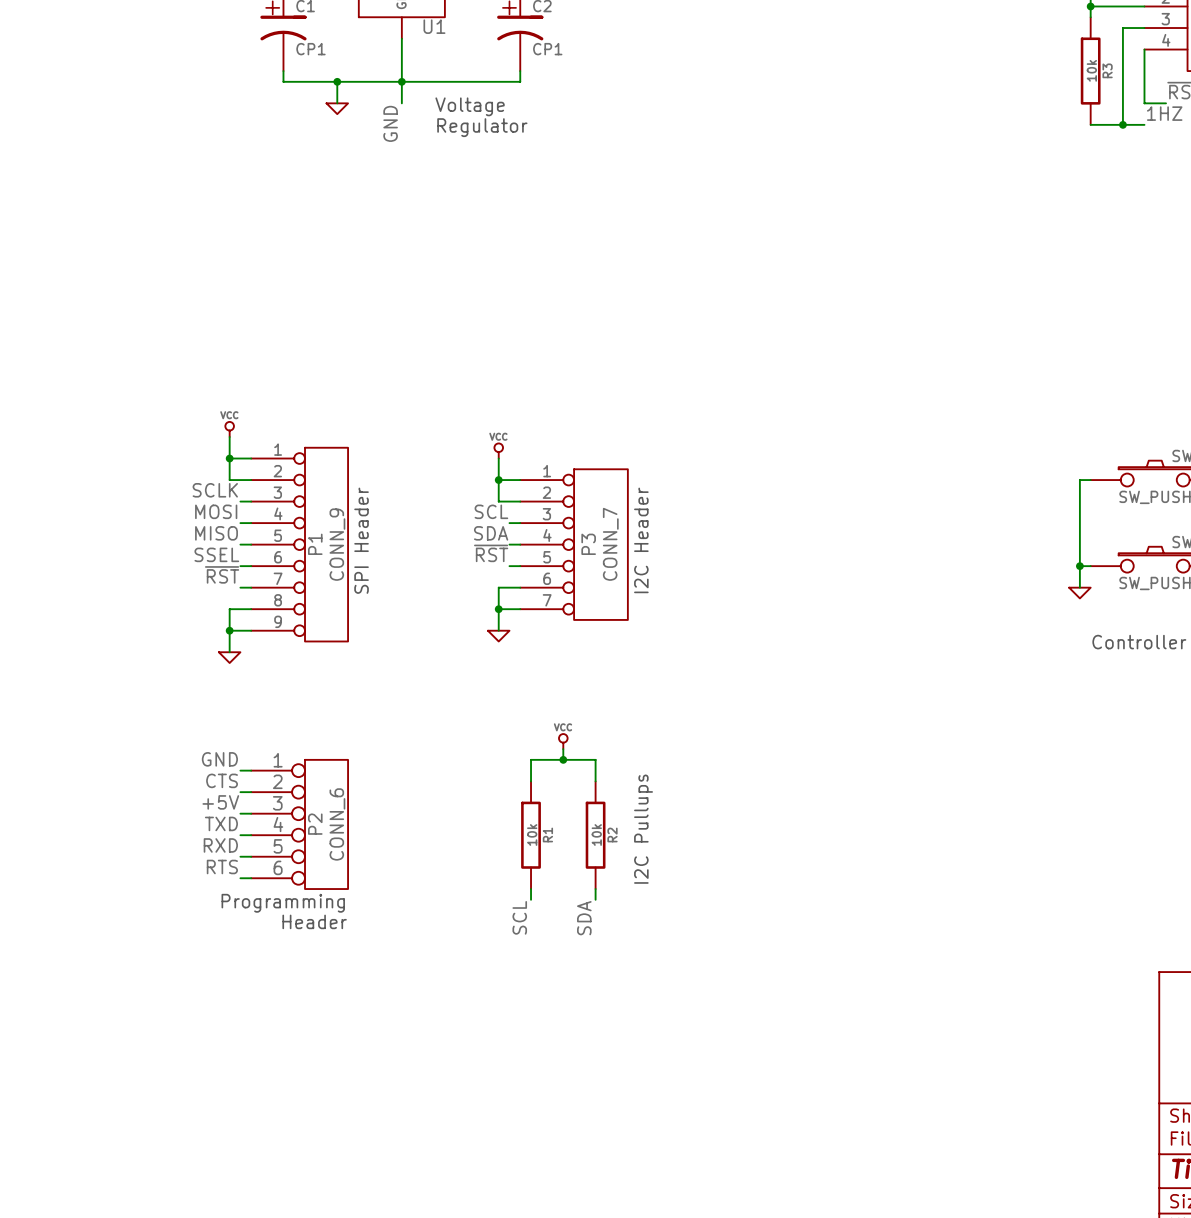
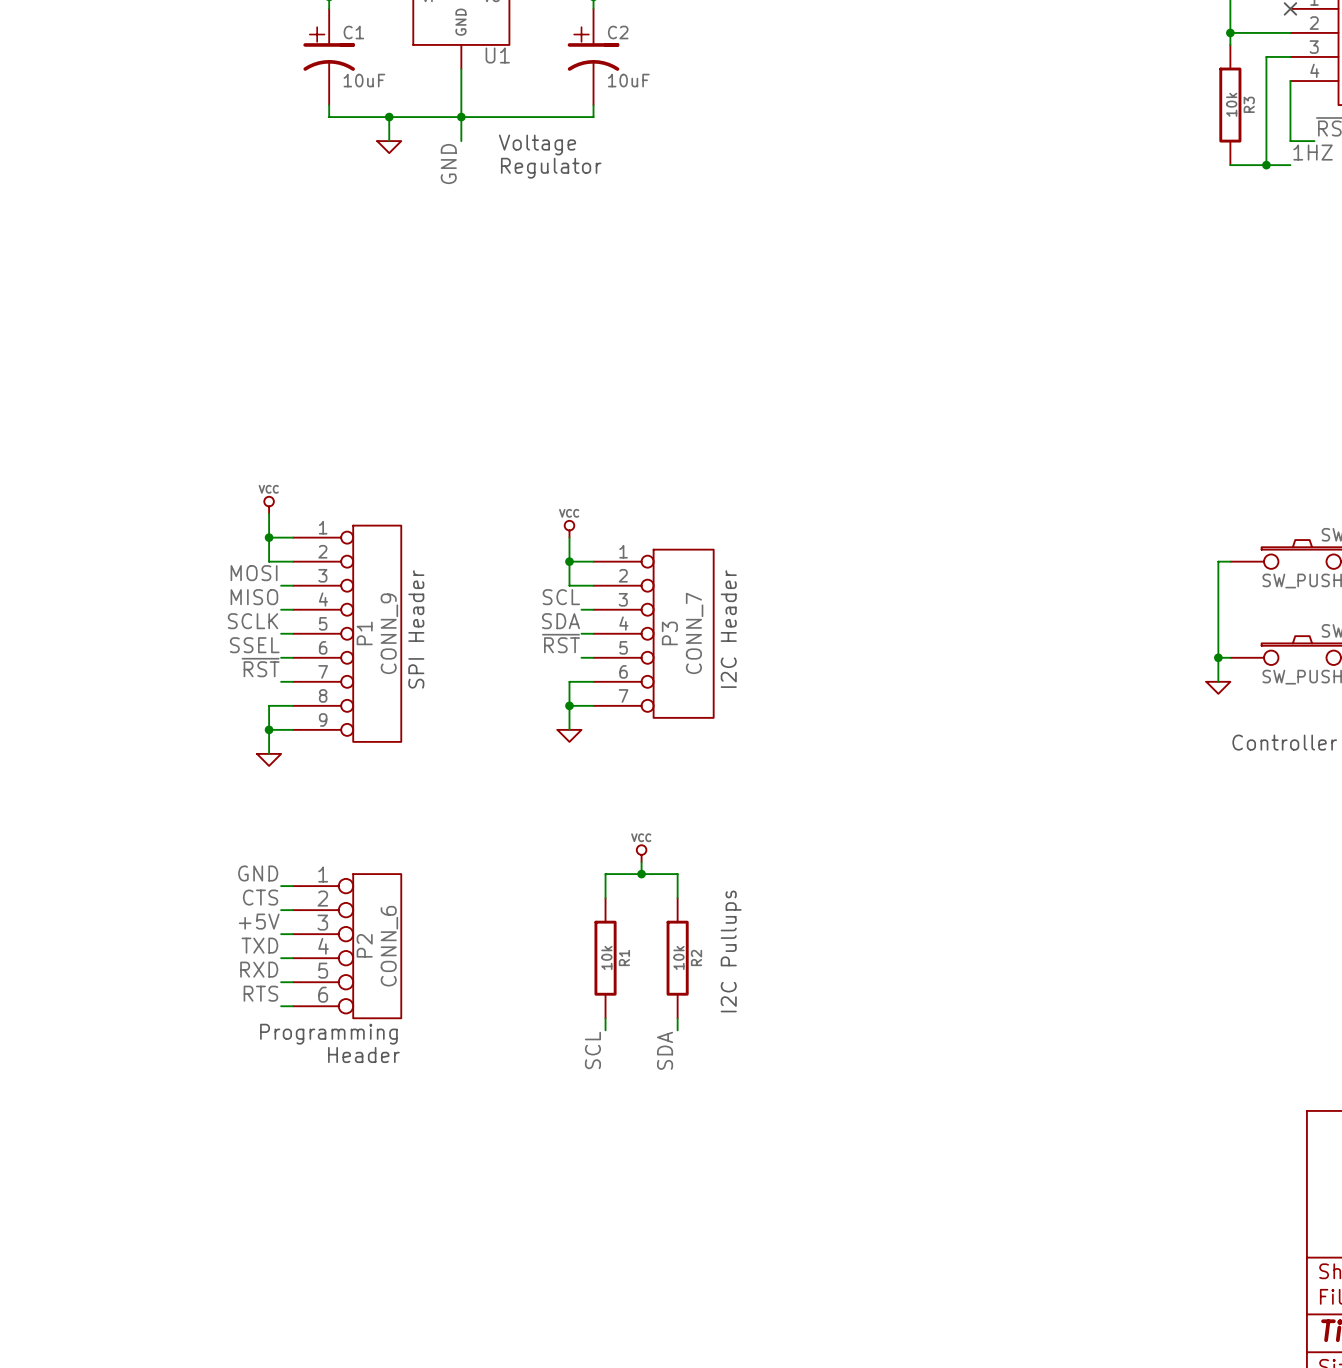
C1 value: CP1 (310, 49) -> 10uF (364, 80)
C2 value: CP1 (547, 49) -> 10uF (628, 80)
label: SCLK (215, 490) -> MOSI (254, 573)
label: MOSI (216, 511) -> MISO (254, 597)
label: MISO (216, 533) -> SCLK (253, 621)

